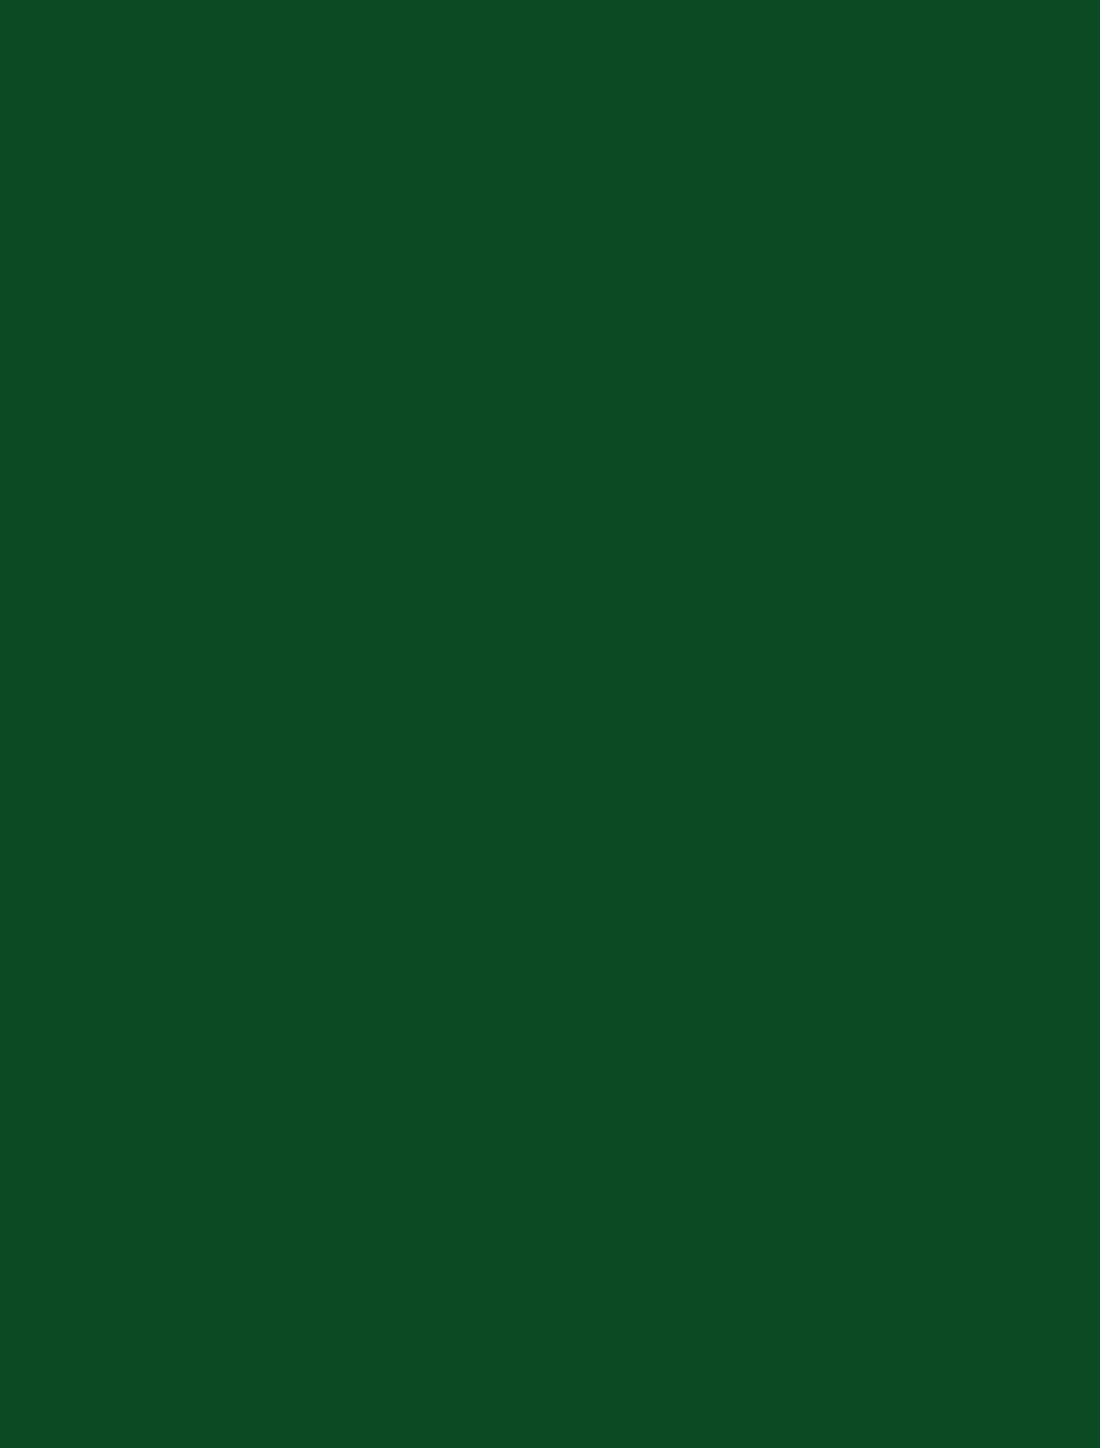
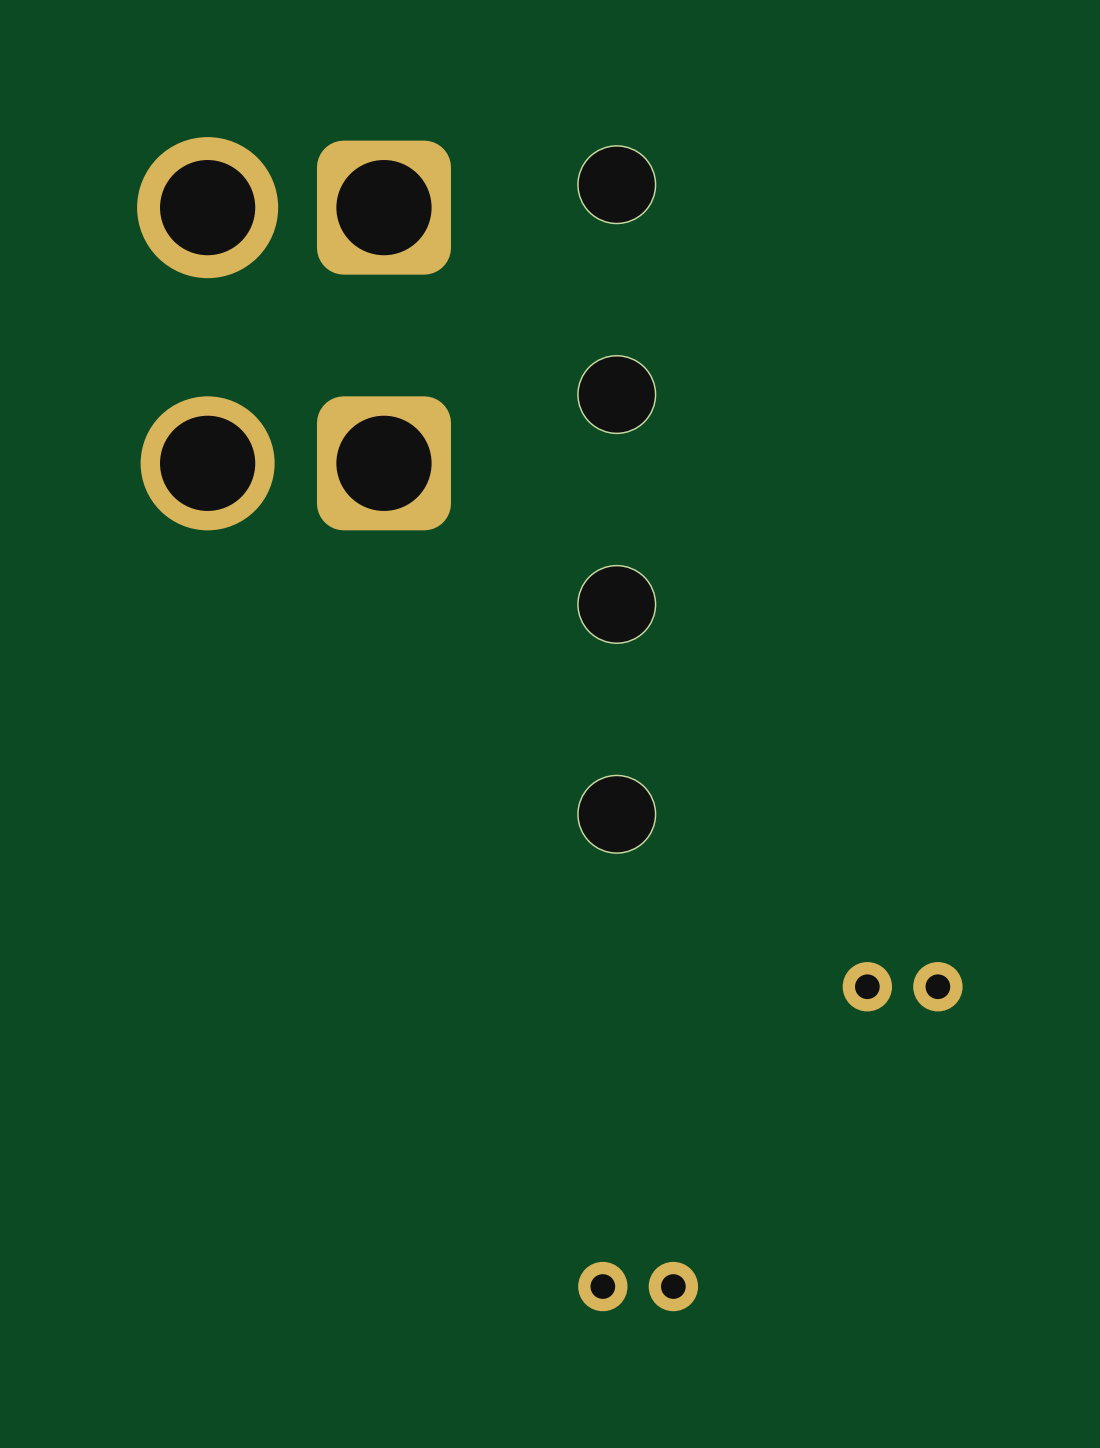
part: none -> (616, 184)
part: none -> (294, 207)
part: none -> (616, 394)
part: none -> (295, 463)
part: none -> (616, 604)
part: none -> (616, 814)
part: none -> (902, 986)
part: none -> (638, 1286)

